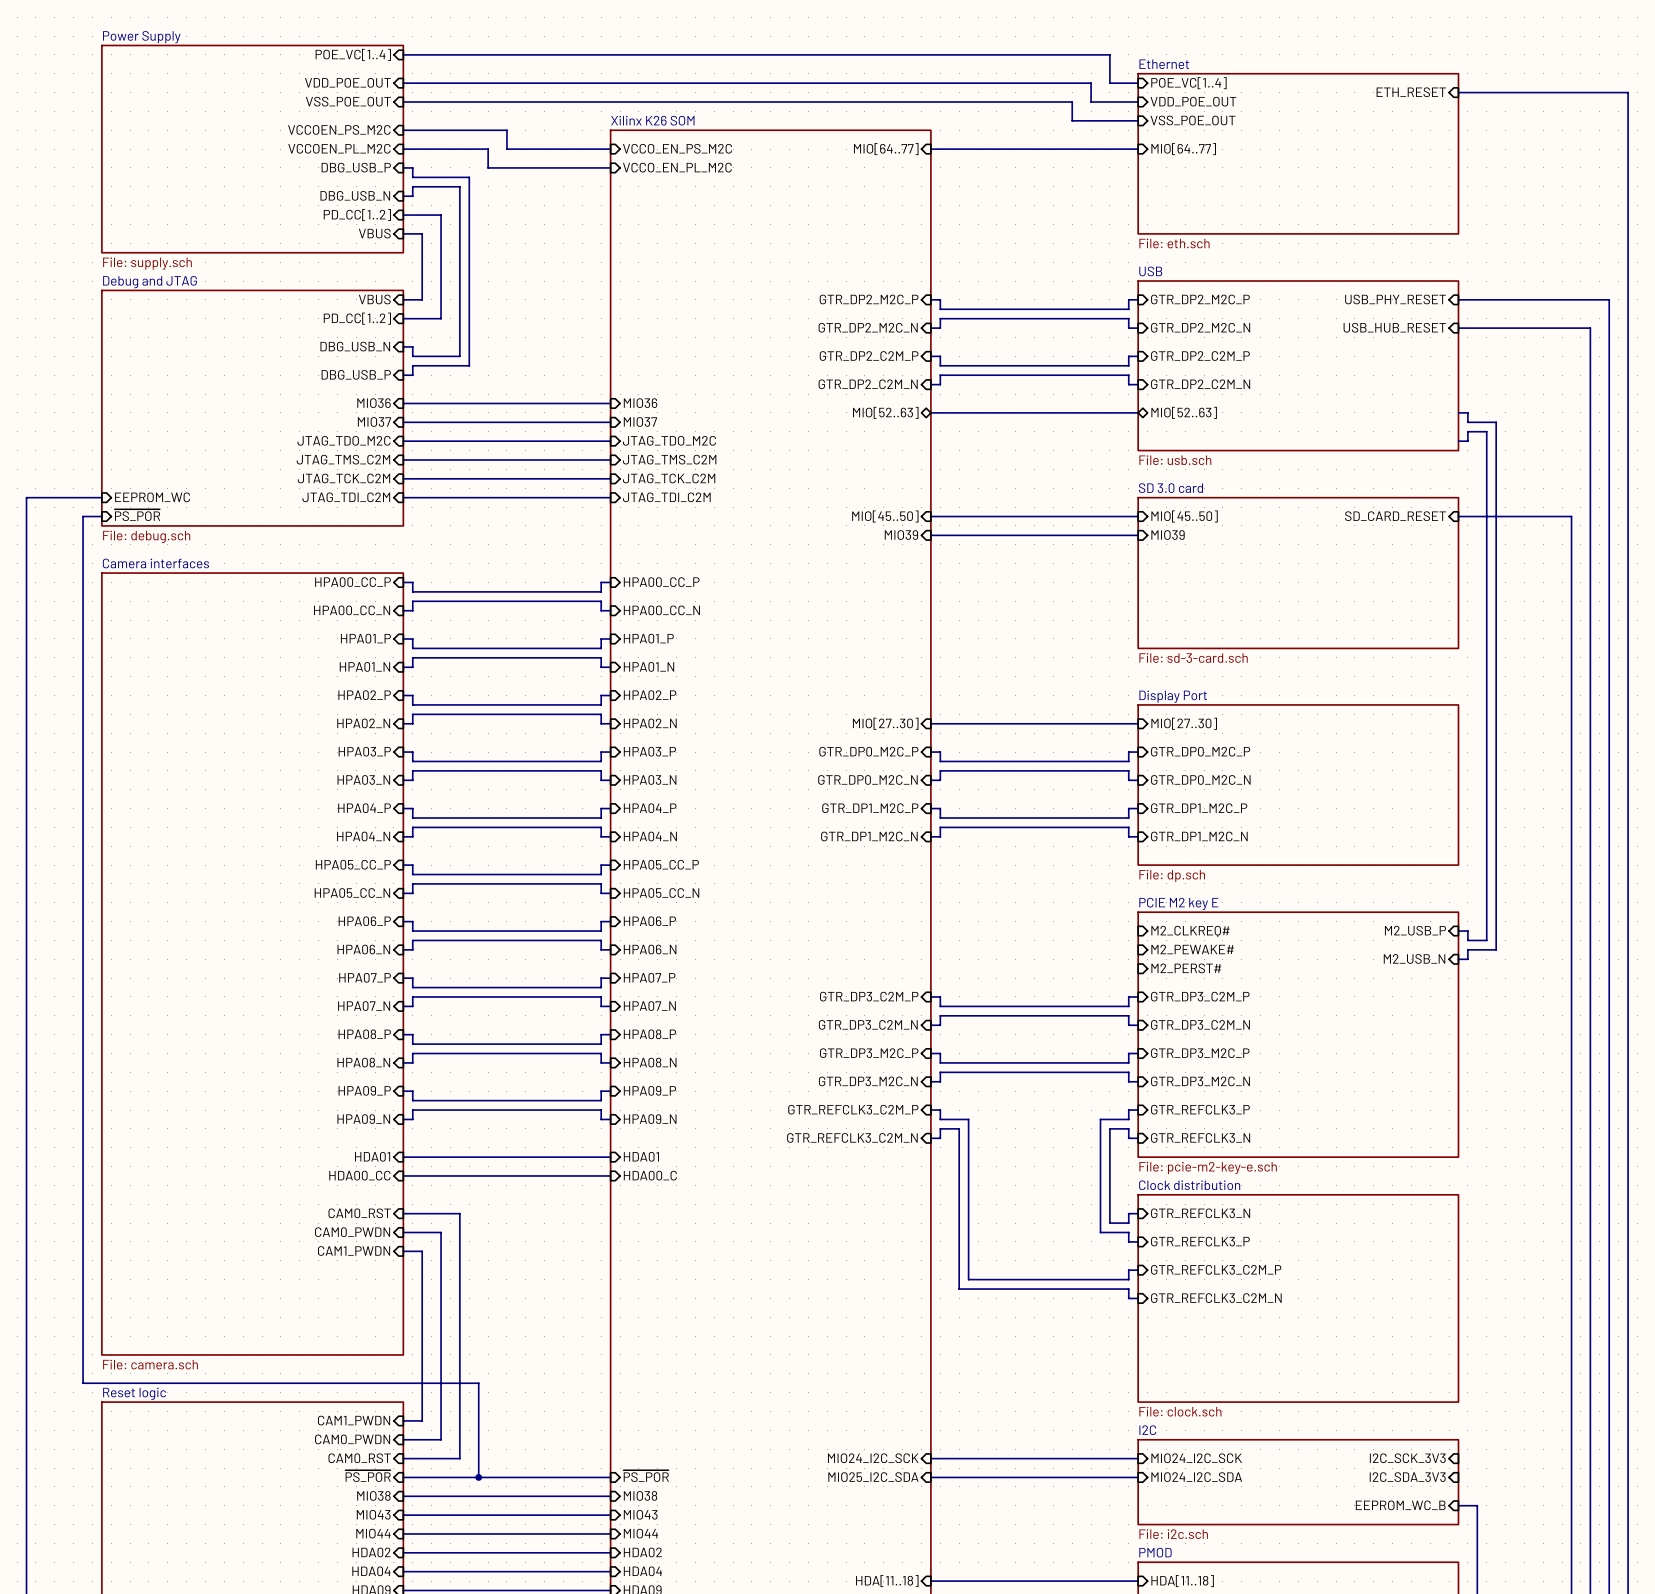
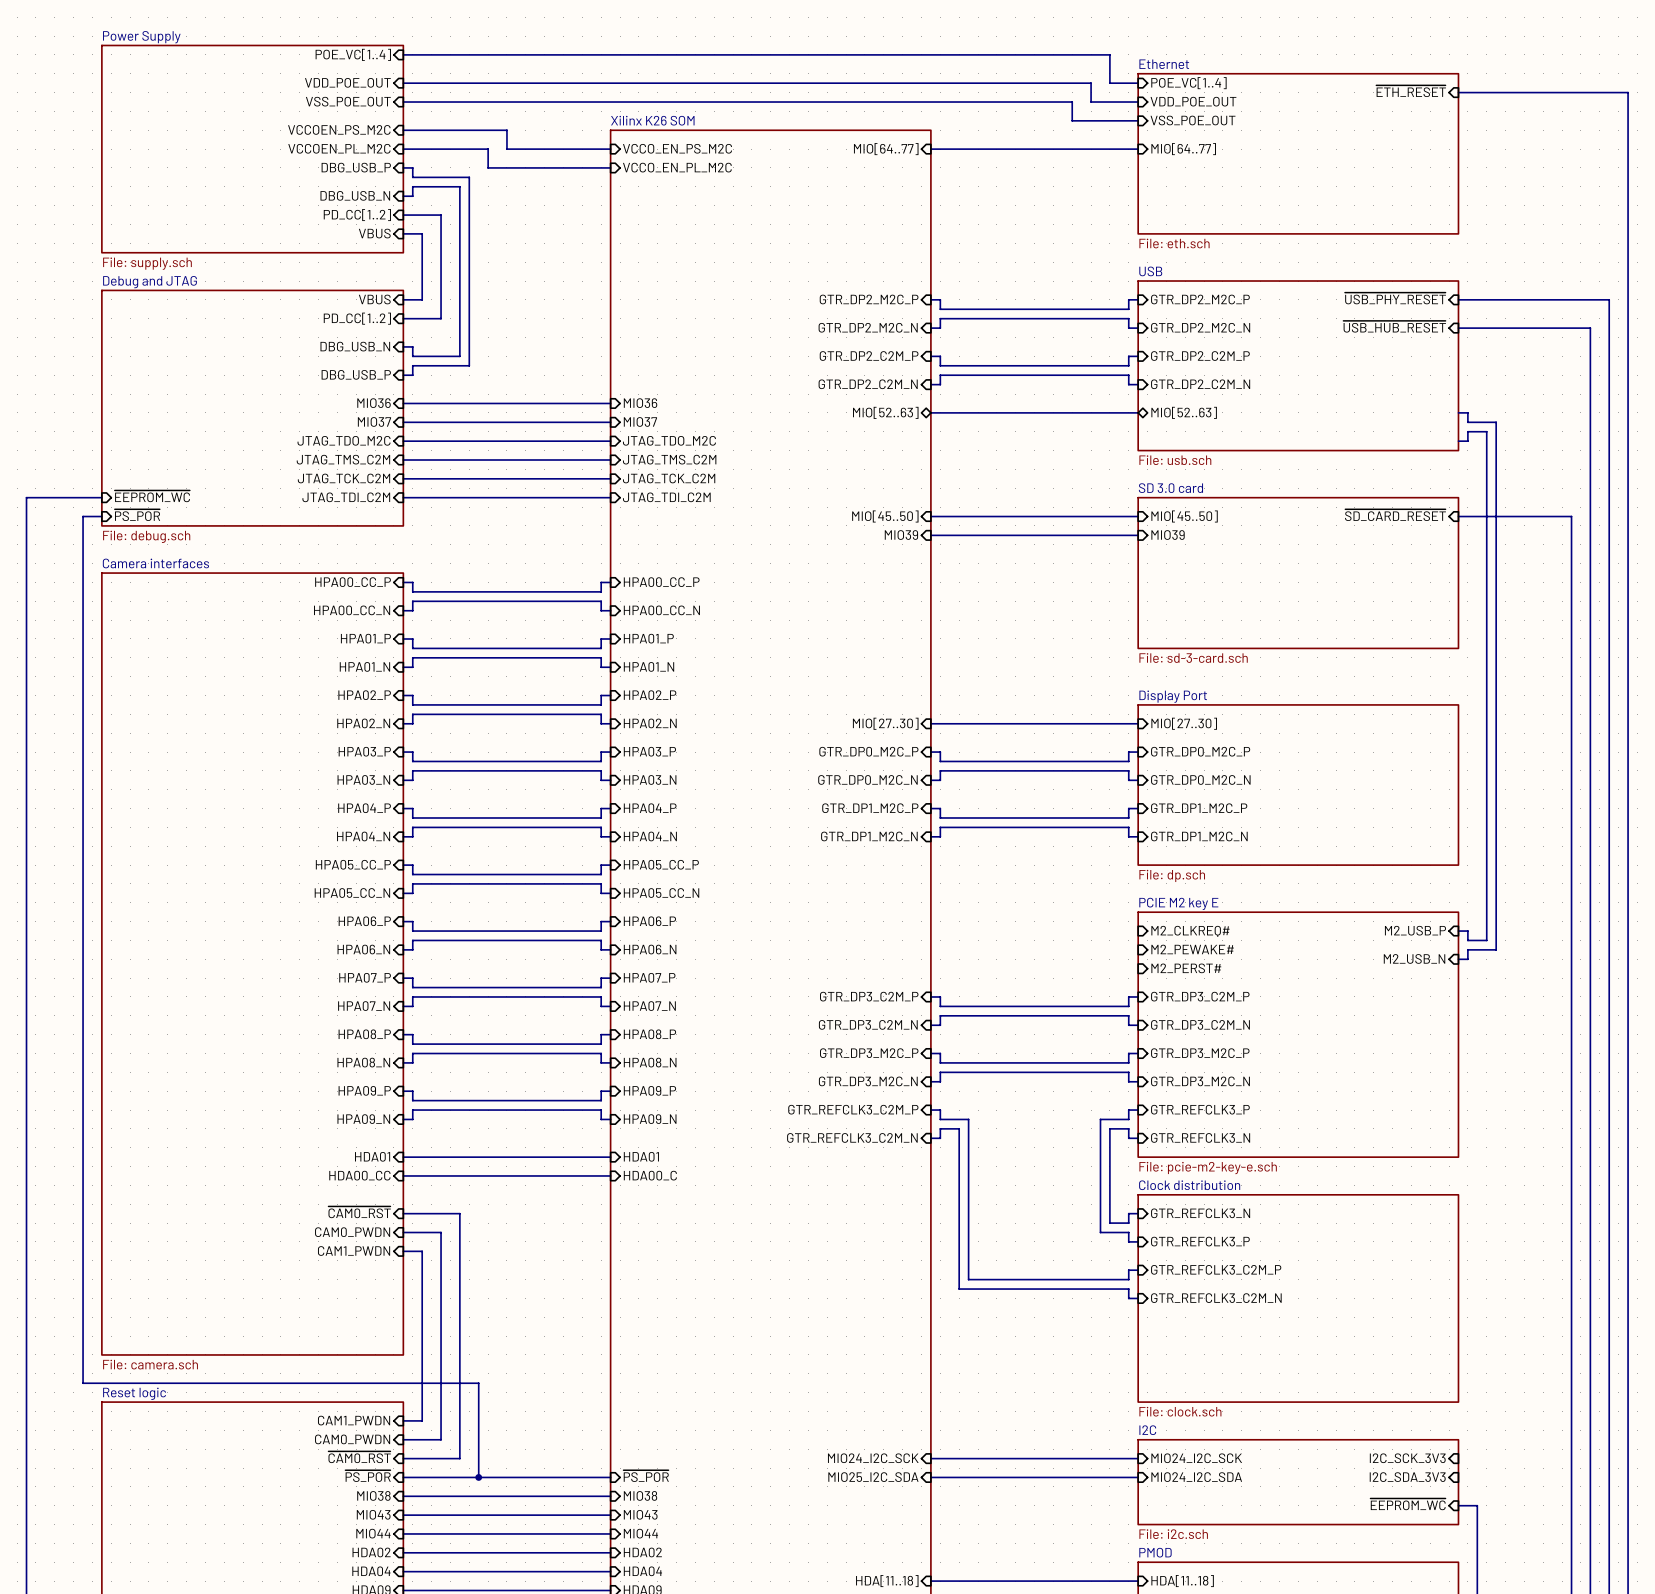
sheet pin: ETH_RESET (1411, 92) -> ~{ETH_RESET} (1411, 91)
sheet pin: USB_PHY_RESET (1395, 299) -> ~{USB_PHY_RESET} (1395, 298)
sheet pin: USB_HUB_RESET (1394, 327) -> ~{USB_HUB_RESET} (1394, 326)
sheet pin: EEPROM_WC (152, 497) -> ~{EEPROM_WC} (152, 496)
sheet pin: SD_CARD_RESET (1395, 516) -> ~{SD_CARD_RESET} (1395, 515)
sheet pin: CAM0_RST (359, 1213) -> ~{CAM0_RST} (359, 1212)
sheet pin: CAM0_RST (359, 1458) -> ~{CAM0_RST} (359, 1457)
sheet pin: EEPROM_WC_B (1400, 1505) -> ~{EEPROM_WC} (1408, 1504)

